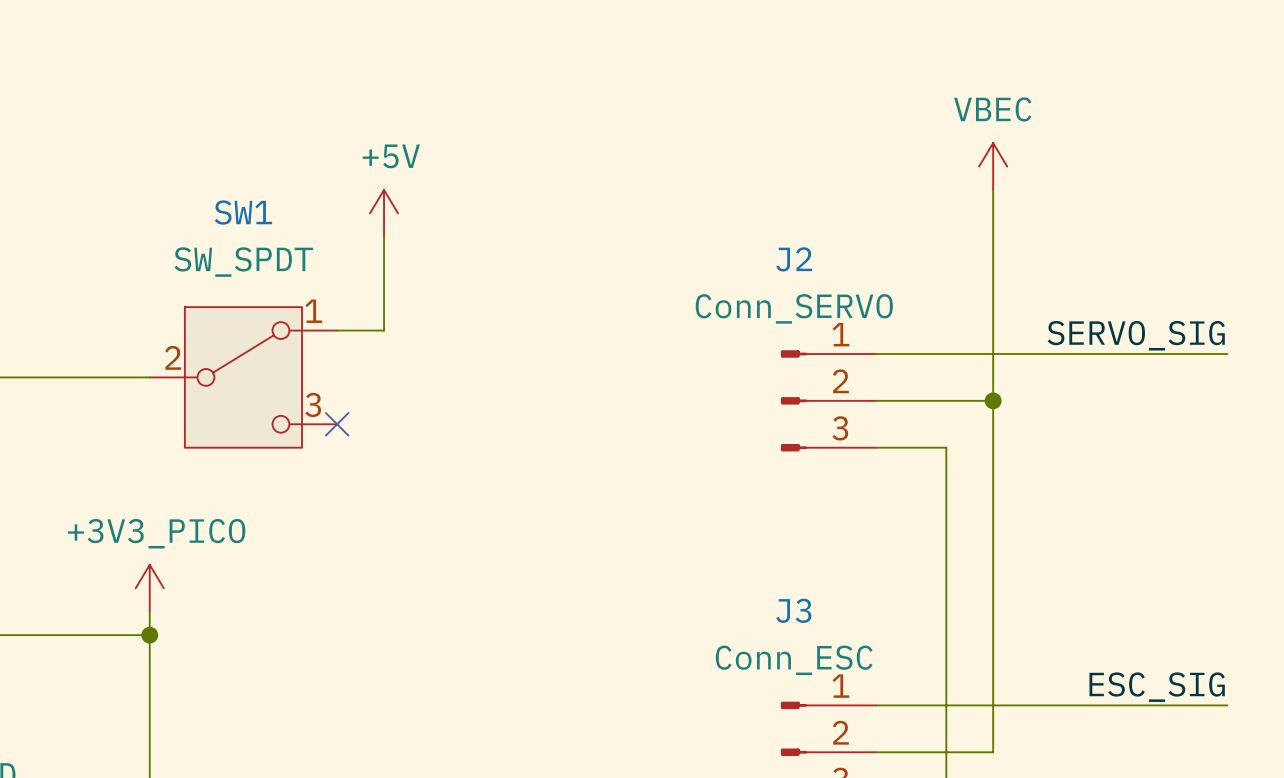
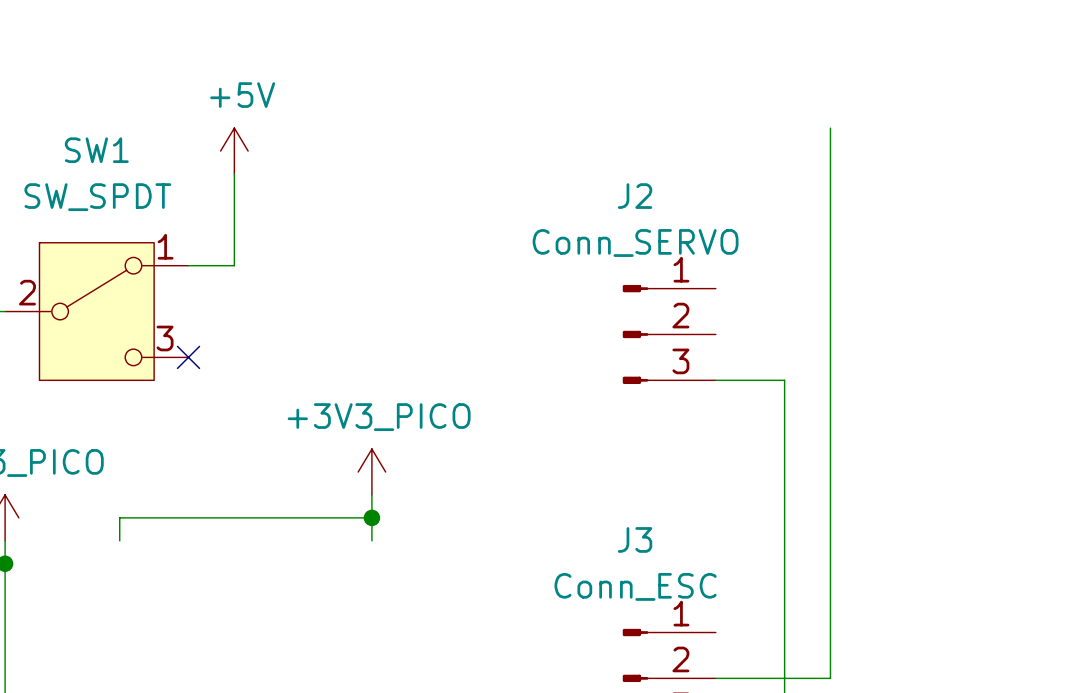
power symbol: VBEC (993, 166) -> none
label: SERVO_SIG (1136, 335) -> none
wire: (876, 353) (1227, 353) -> none
wire: (876, 400) (993, 400) -> none
junction: (993, 400) -> none
power symbol: none -> +3V3_PICO (371, 472)
wire: none -> (371, 494) (371, 540)
wire: none -> (371, 517) (119, 517) (119, 540)
junction: none -> (371, 517)
label: ESC_SIG (1157, 687) -> none
wire: (876, 705) (1227, 705) -> none

